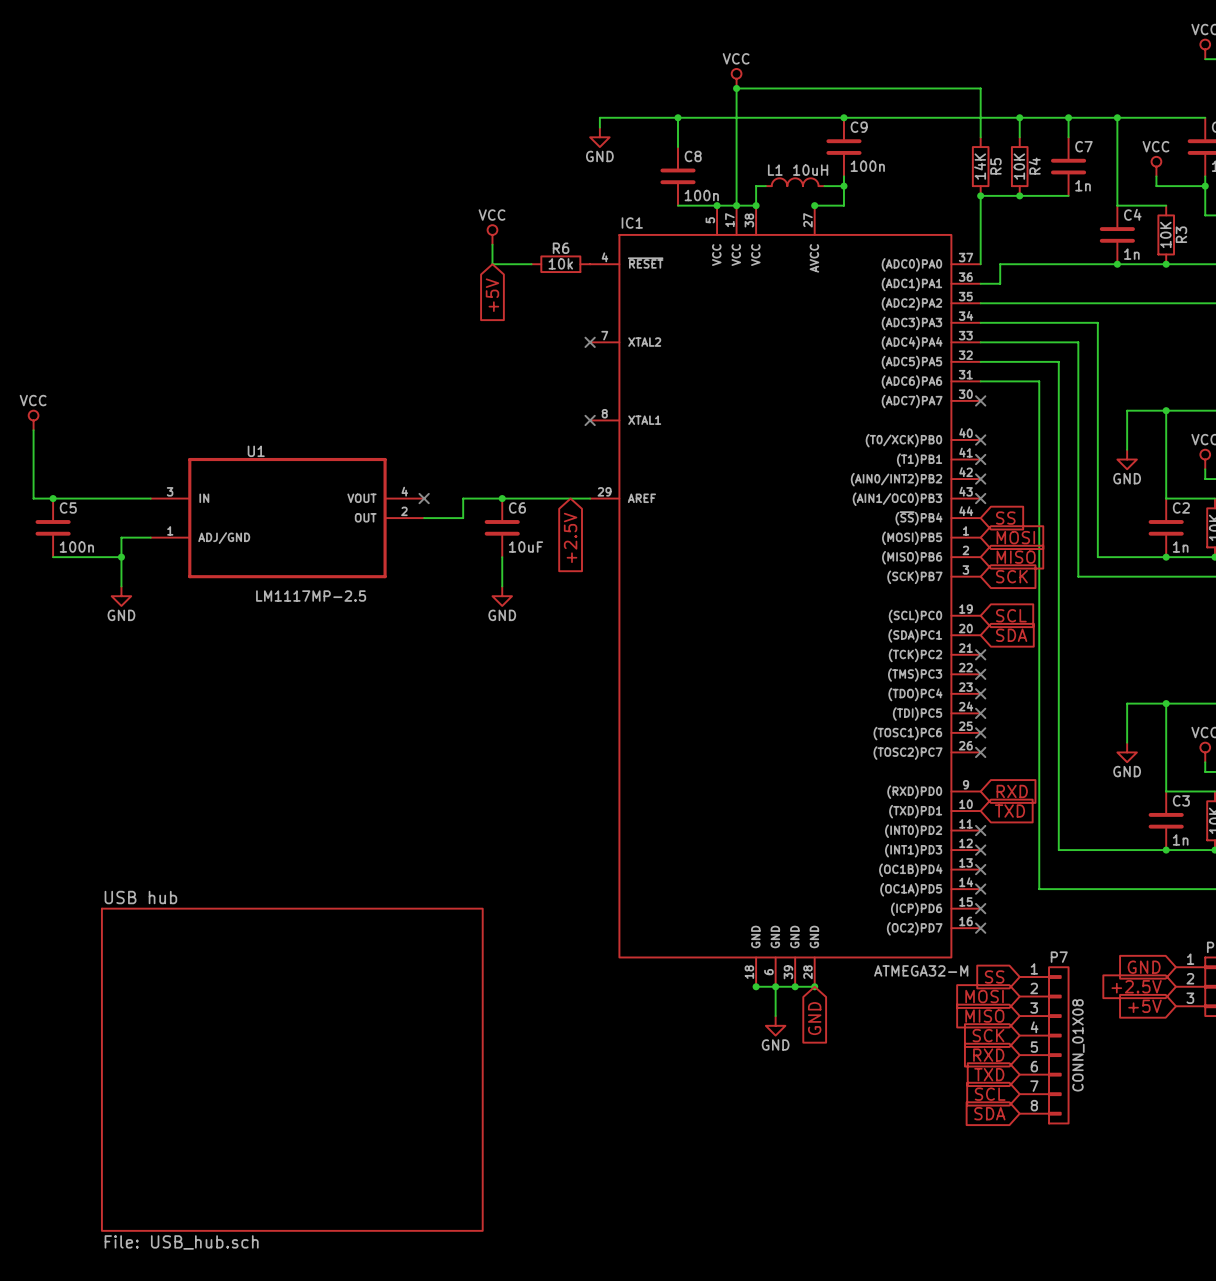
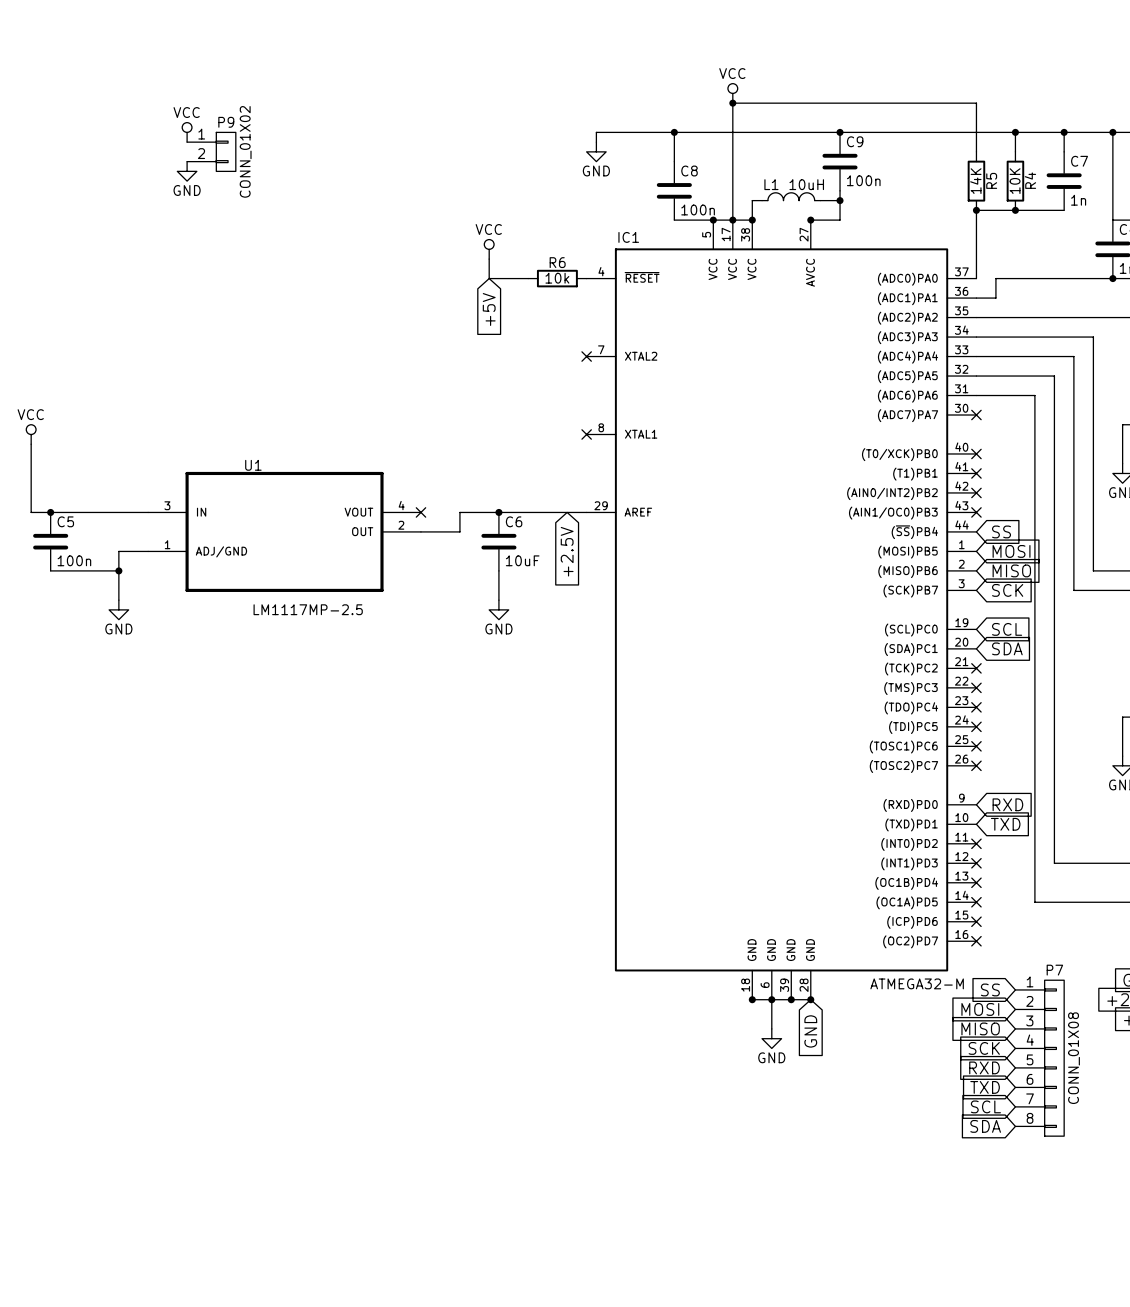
power symbol: none -> VCC (187, 132)
P9: none -> CONN_01X02 (211, 151)
power symbol: none -> GND (187, 171)
sheet USB hub: File: USB_hub.sch (292, 1069) -> none

